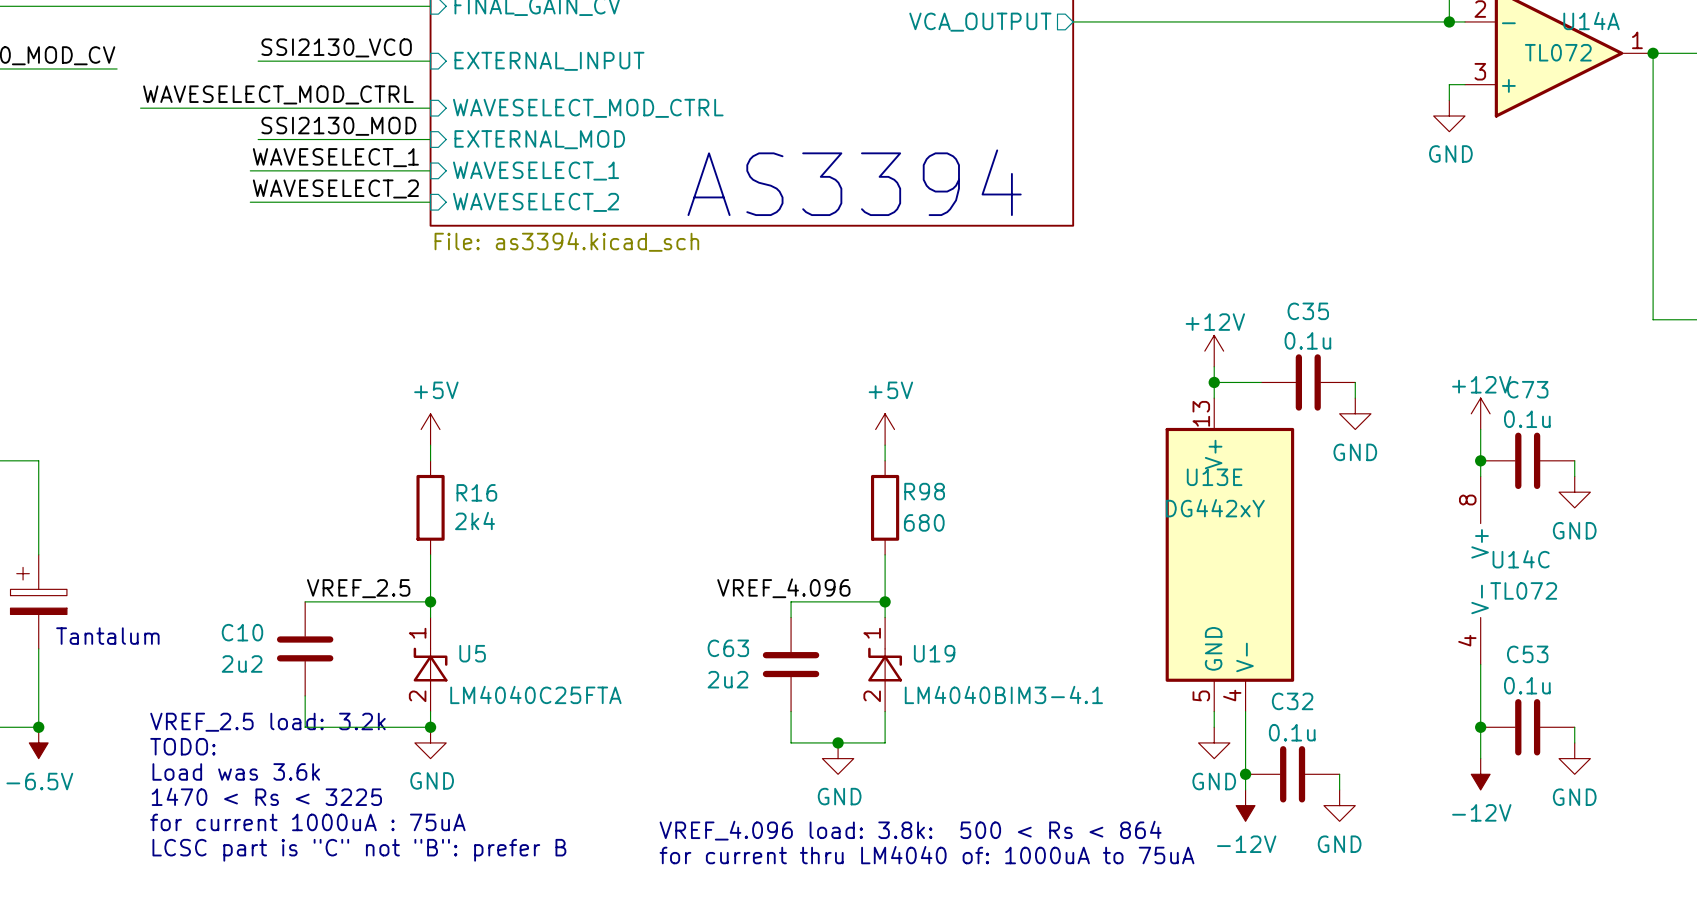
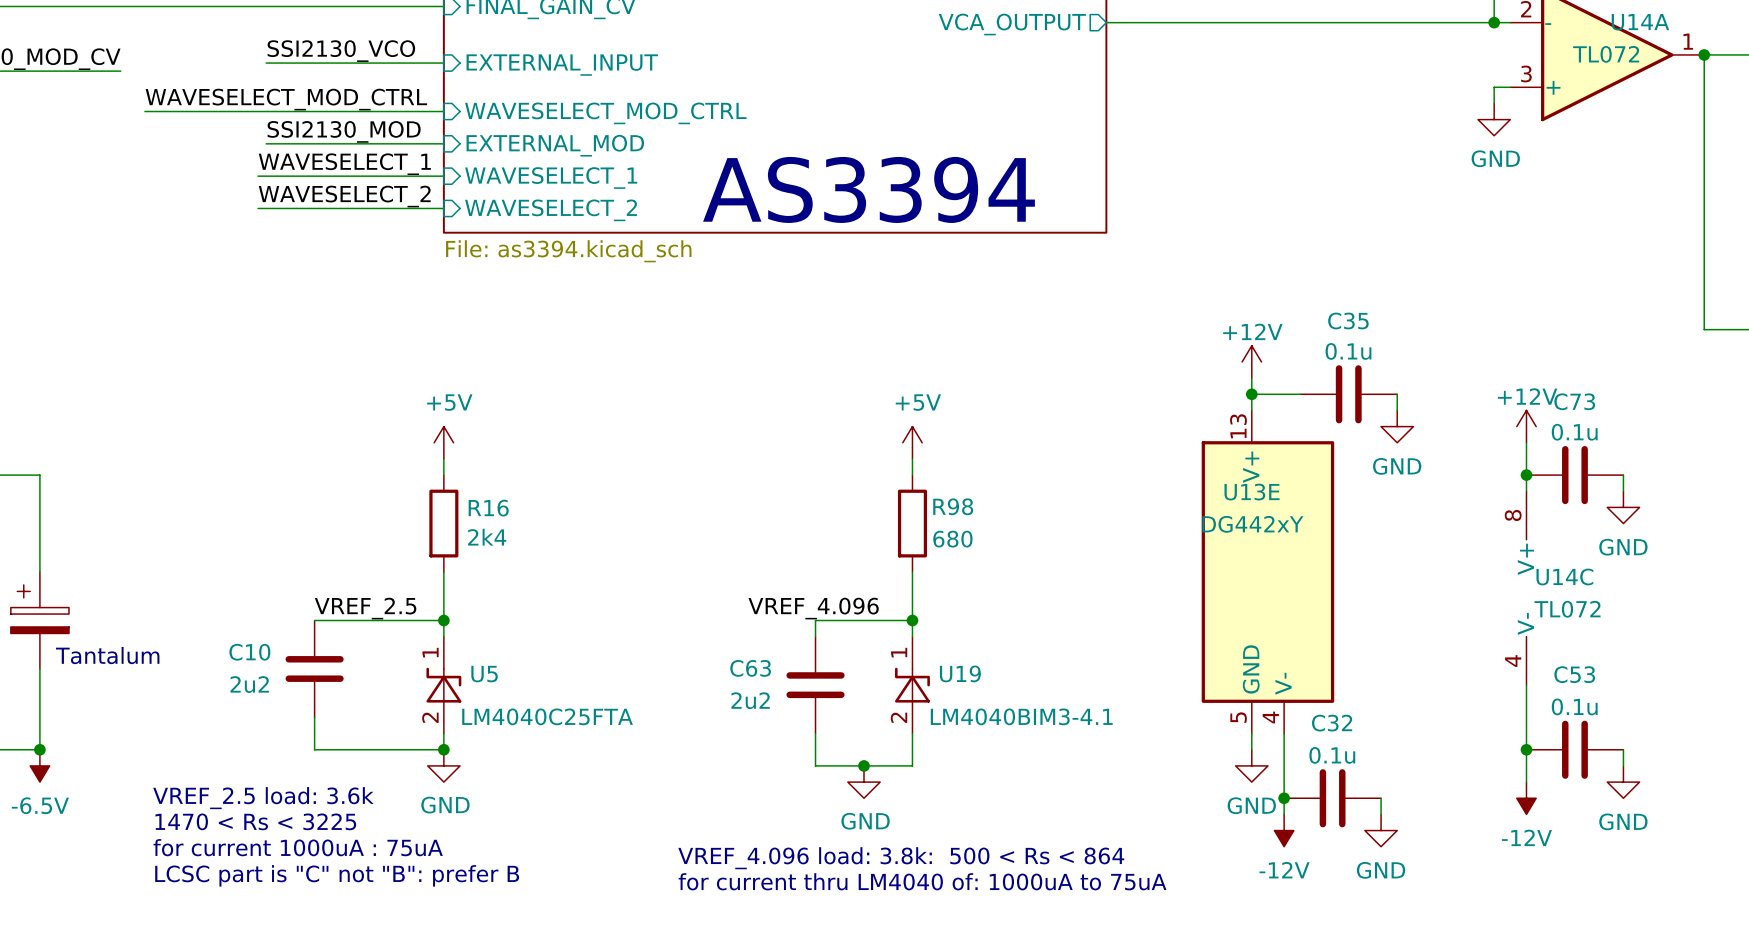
text: VREF_2.5 load: 3.2k (267, 722) -> none
text: TODO: (182, 746) -> none
text: Load was 3.6k (236, 771) -> VREF_2.5 load: 3.6k (263, 798)

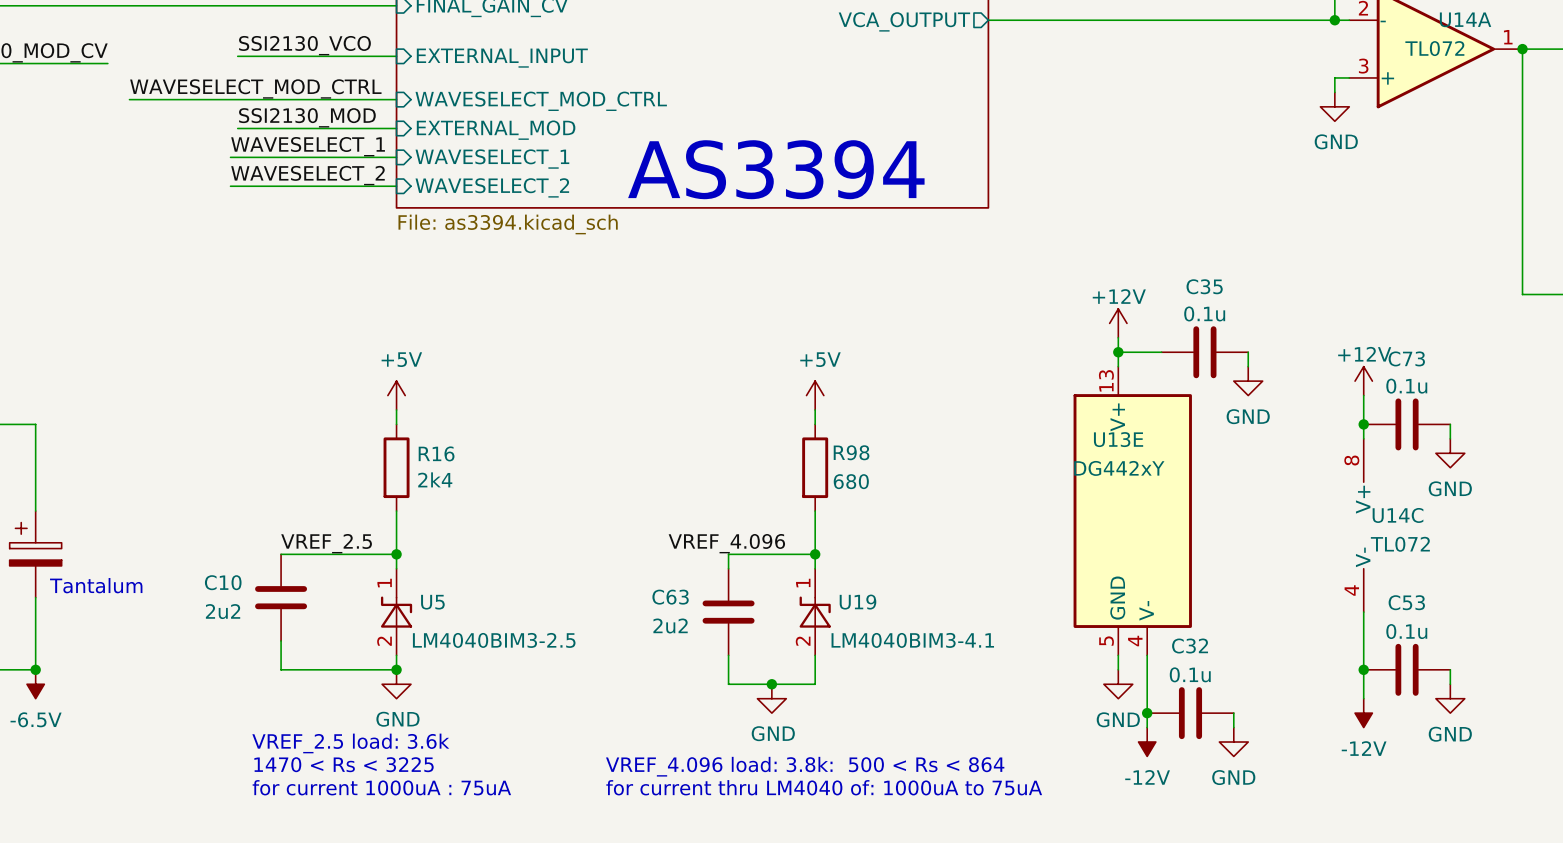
U5 value: LM4040C25FTA (547, 716) -> LM4040BIM3-2.5 (494, 640)
text position: VREF_2.5 load: 3.6k (263, 798) -> VREF_2.5 load: 3.6k (350, 743)
text position: 1470 < Rs < 3225 (255, 821) -> 1470 < Rs < 3225 (344, 764)
text position: for current 1000uA : 75uA (298, 847) -> for current 1000uA : 75uA (381, 787)
text: LCSC part is "C" not "B": prefer B (337, 875) -> none

